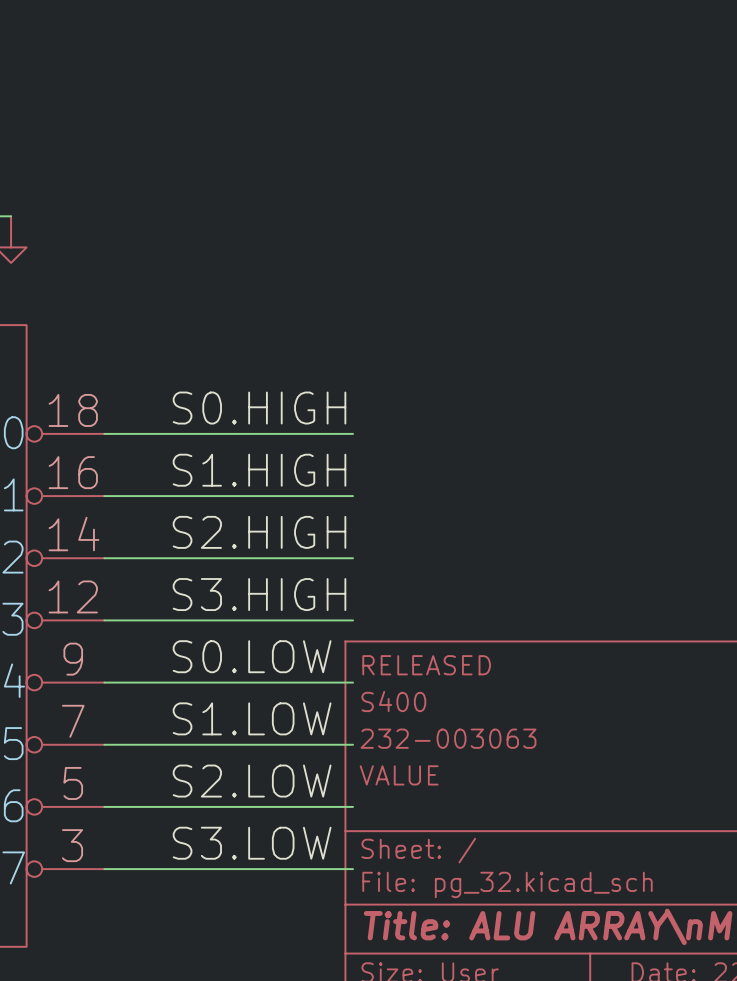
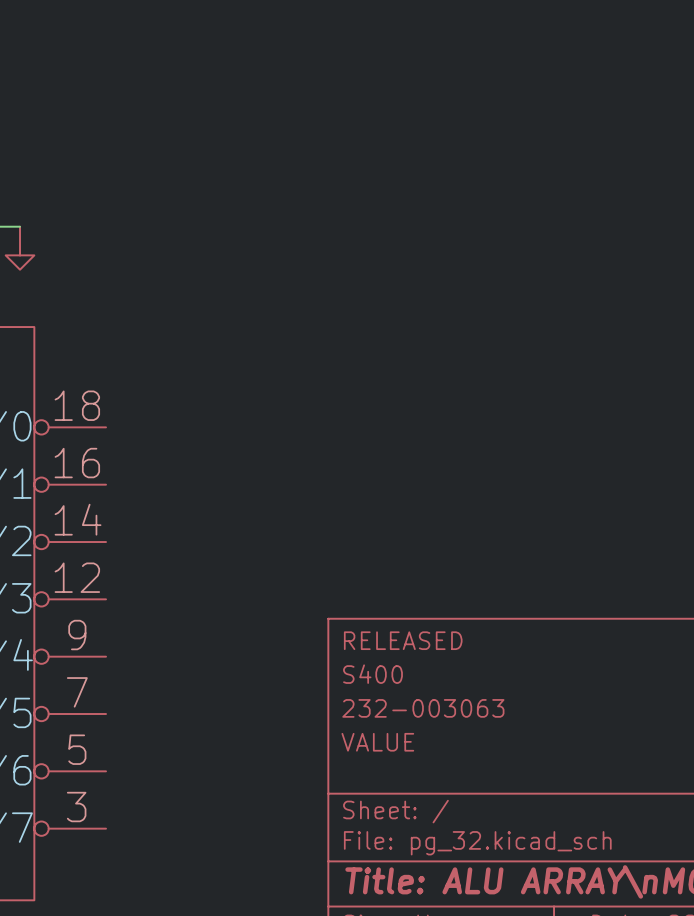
label: S0.HIGH (259, 408) -> none
wire: (104, 433) (353, 433) -> none
label: S1.HIGH (259, 470) -> none
wire: (104, 496) (353, 496) -> none
label: S2.HIGH (259, 532) -> none
wire: (104, 558) (353, 558) -> none
label: S3.HIGH (259, 594) -> none
wire: (104, 620) (353, 620) -> none
label: S0.LOW (252, 656) -> none
wire: (104, 682) (353, 682) -> none
label: S1.LOW (252, 718) -> none
wire: (104, 744) (353, 744) -> none
label: S2.LOW (252, 781) -> none
wire: (104, 806) (353, 806) -> none
label: S3.LOW (252, 843) -> none
wire: (104, 869) (353, 869) -> none

